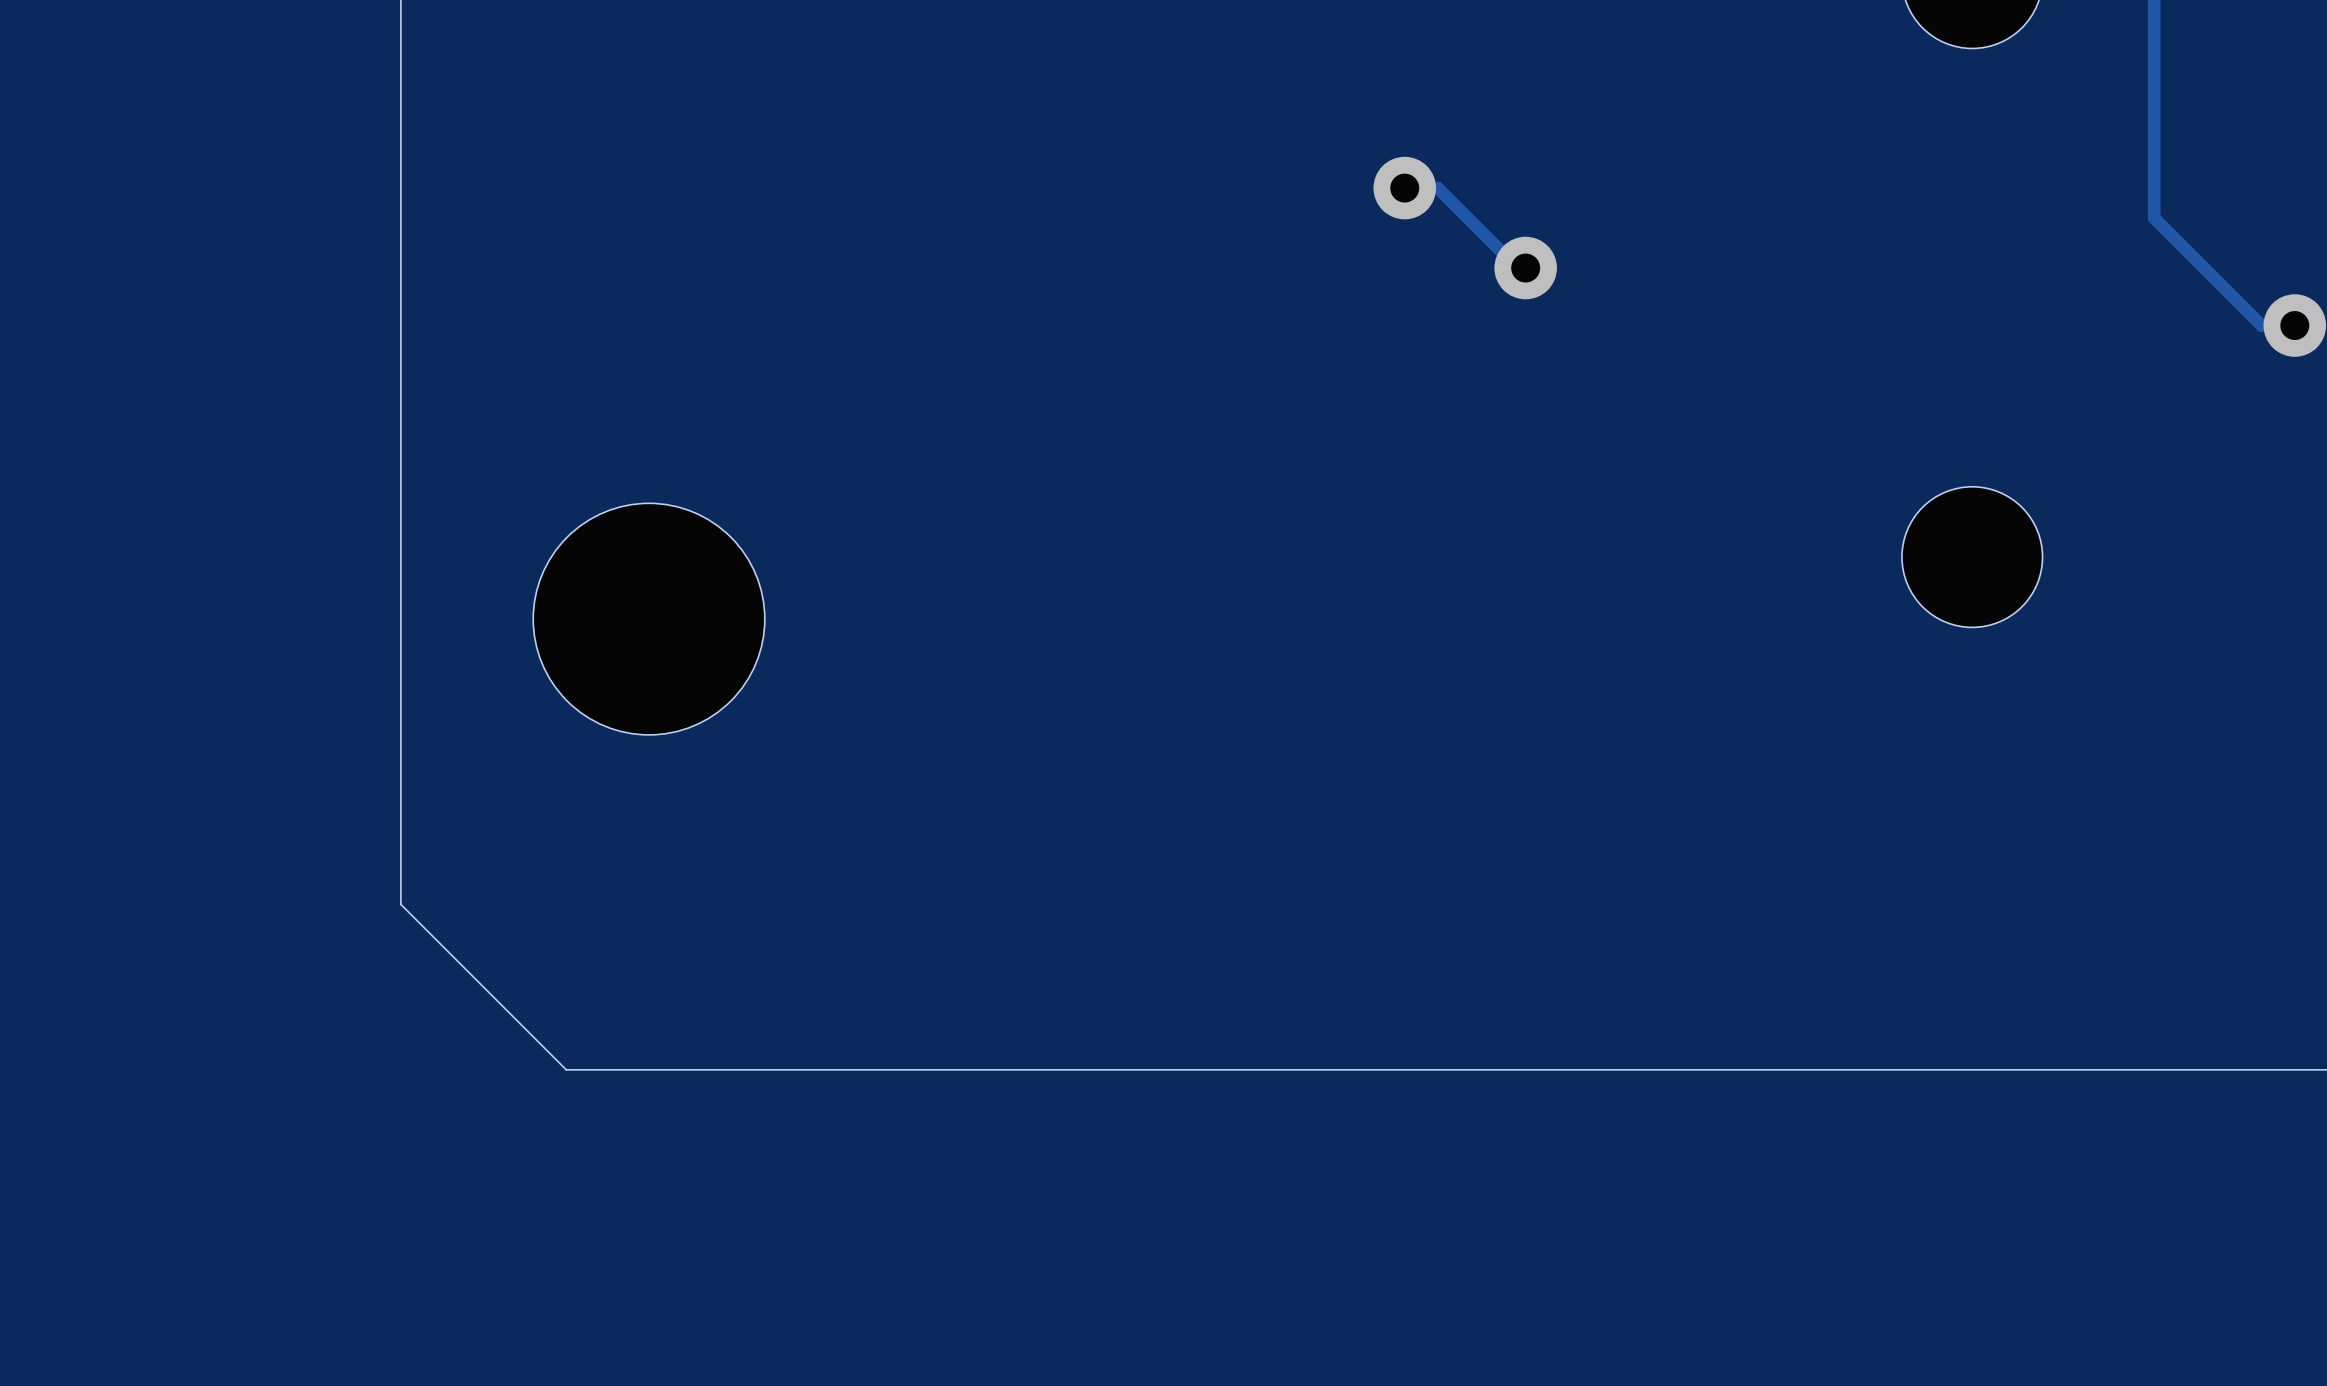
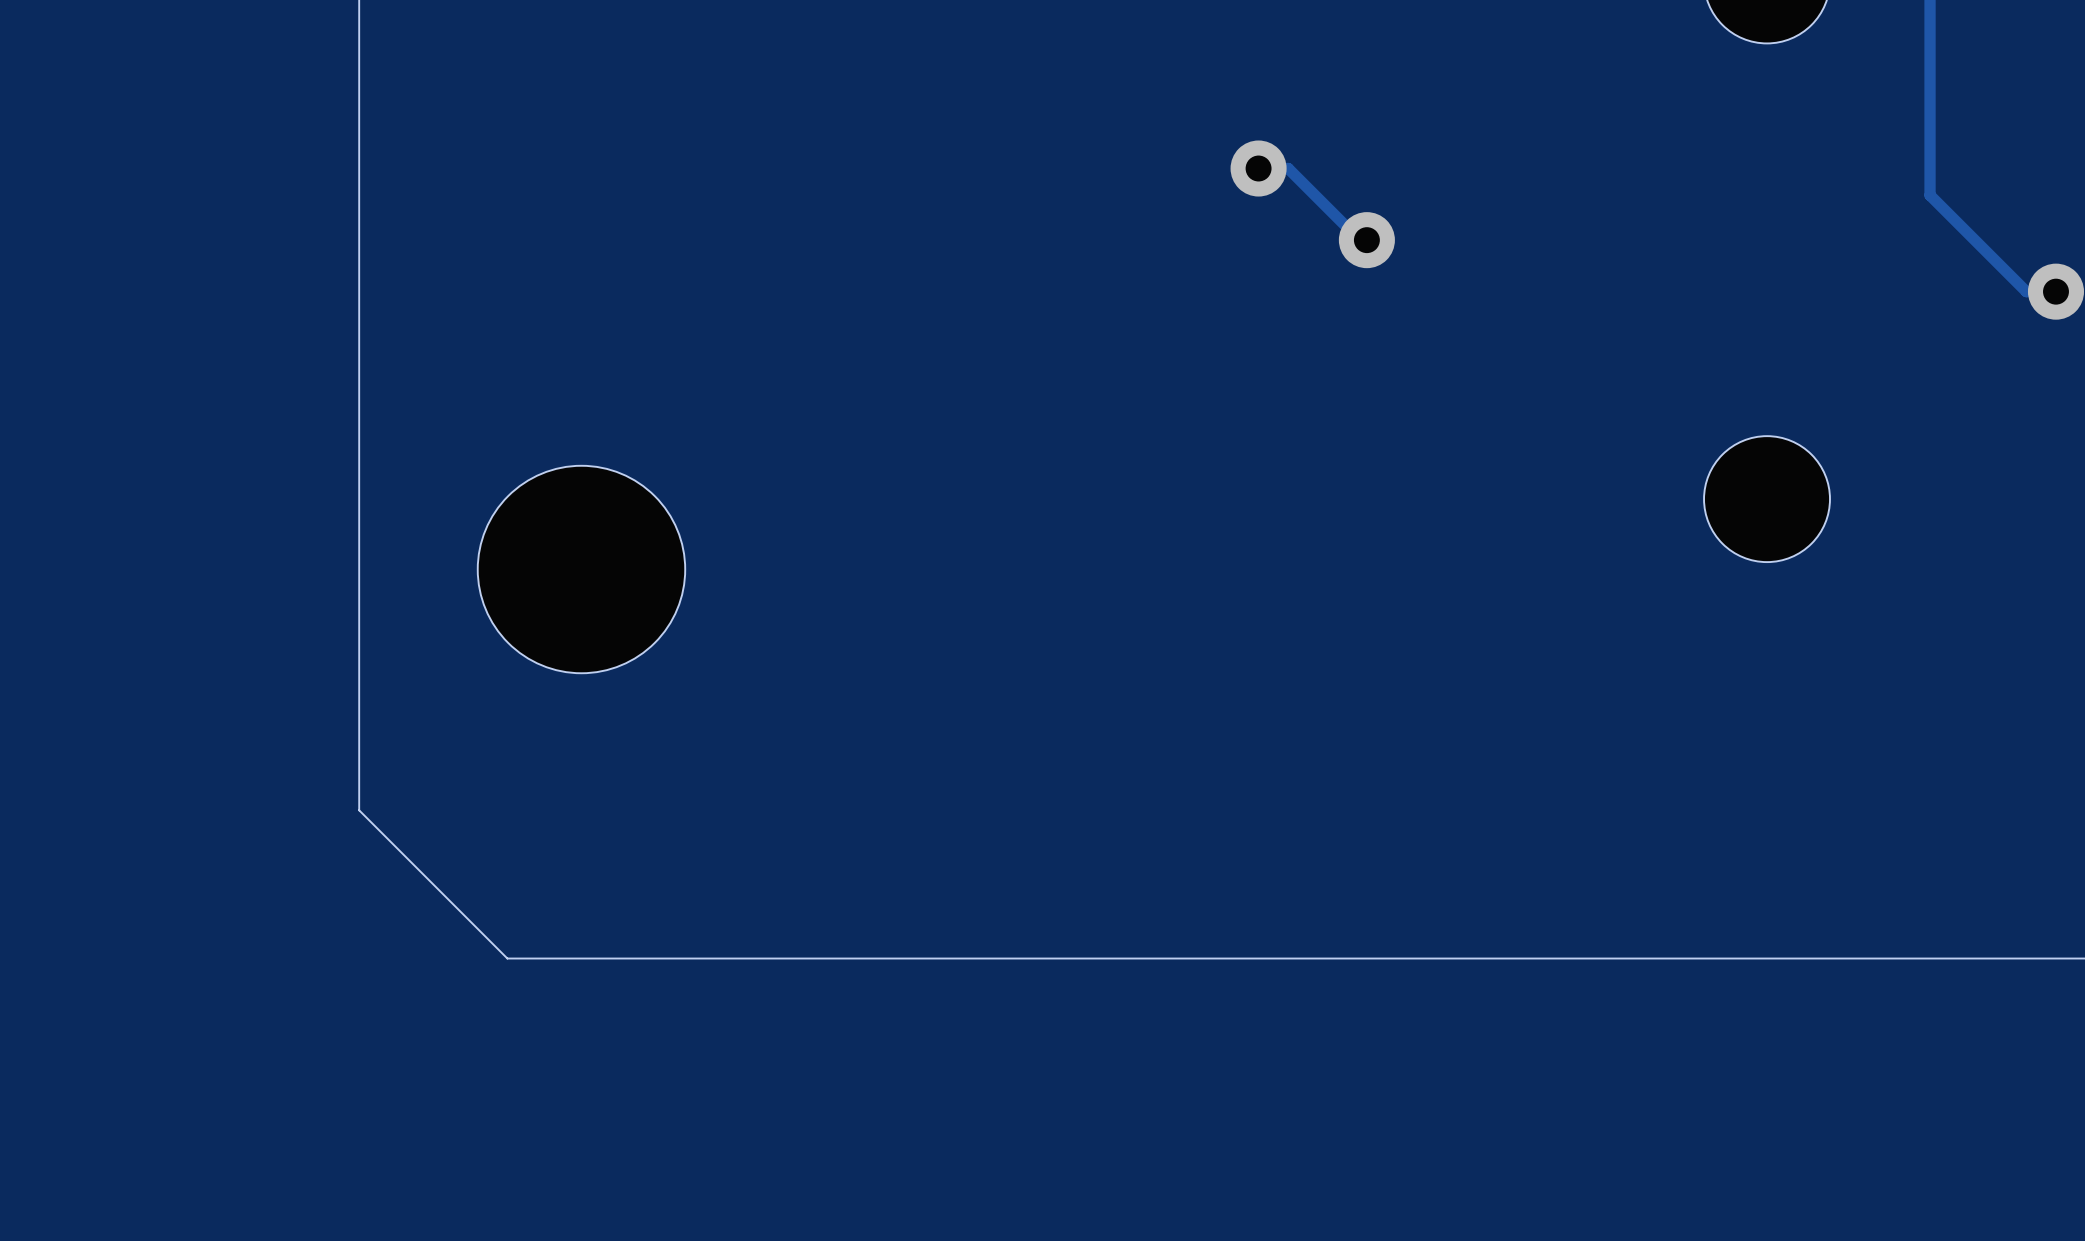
hole position: (649, 619) -> (581, 569)

